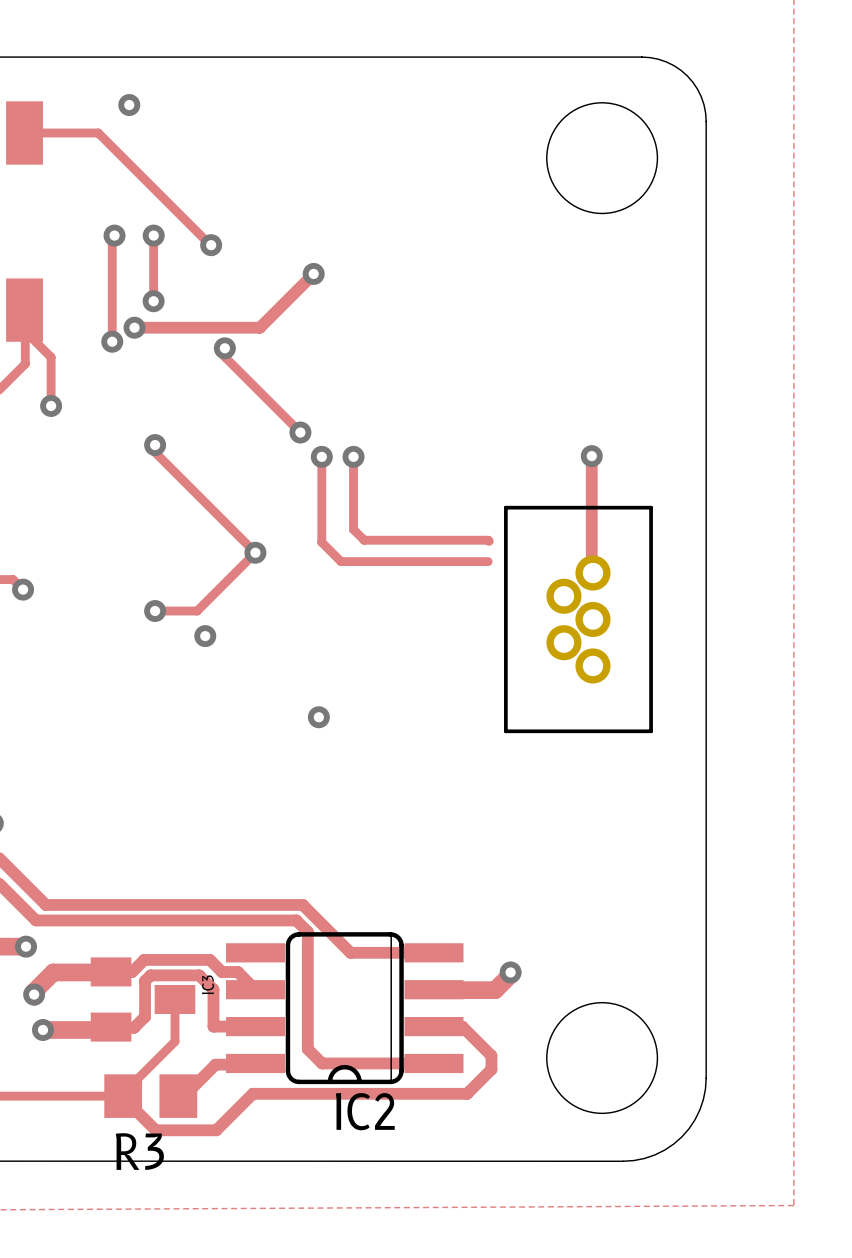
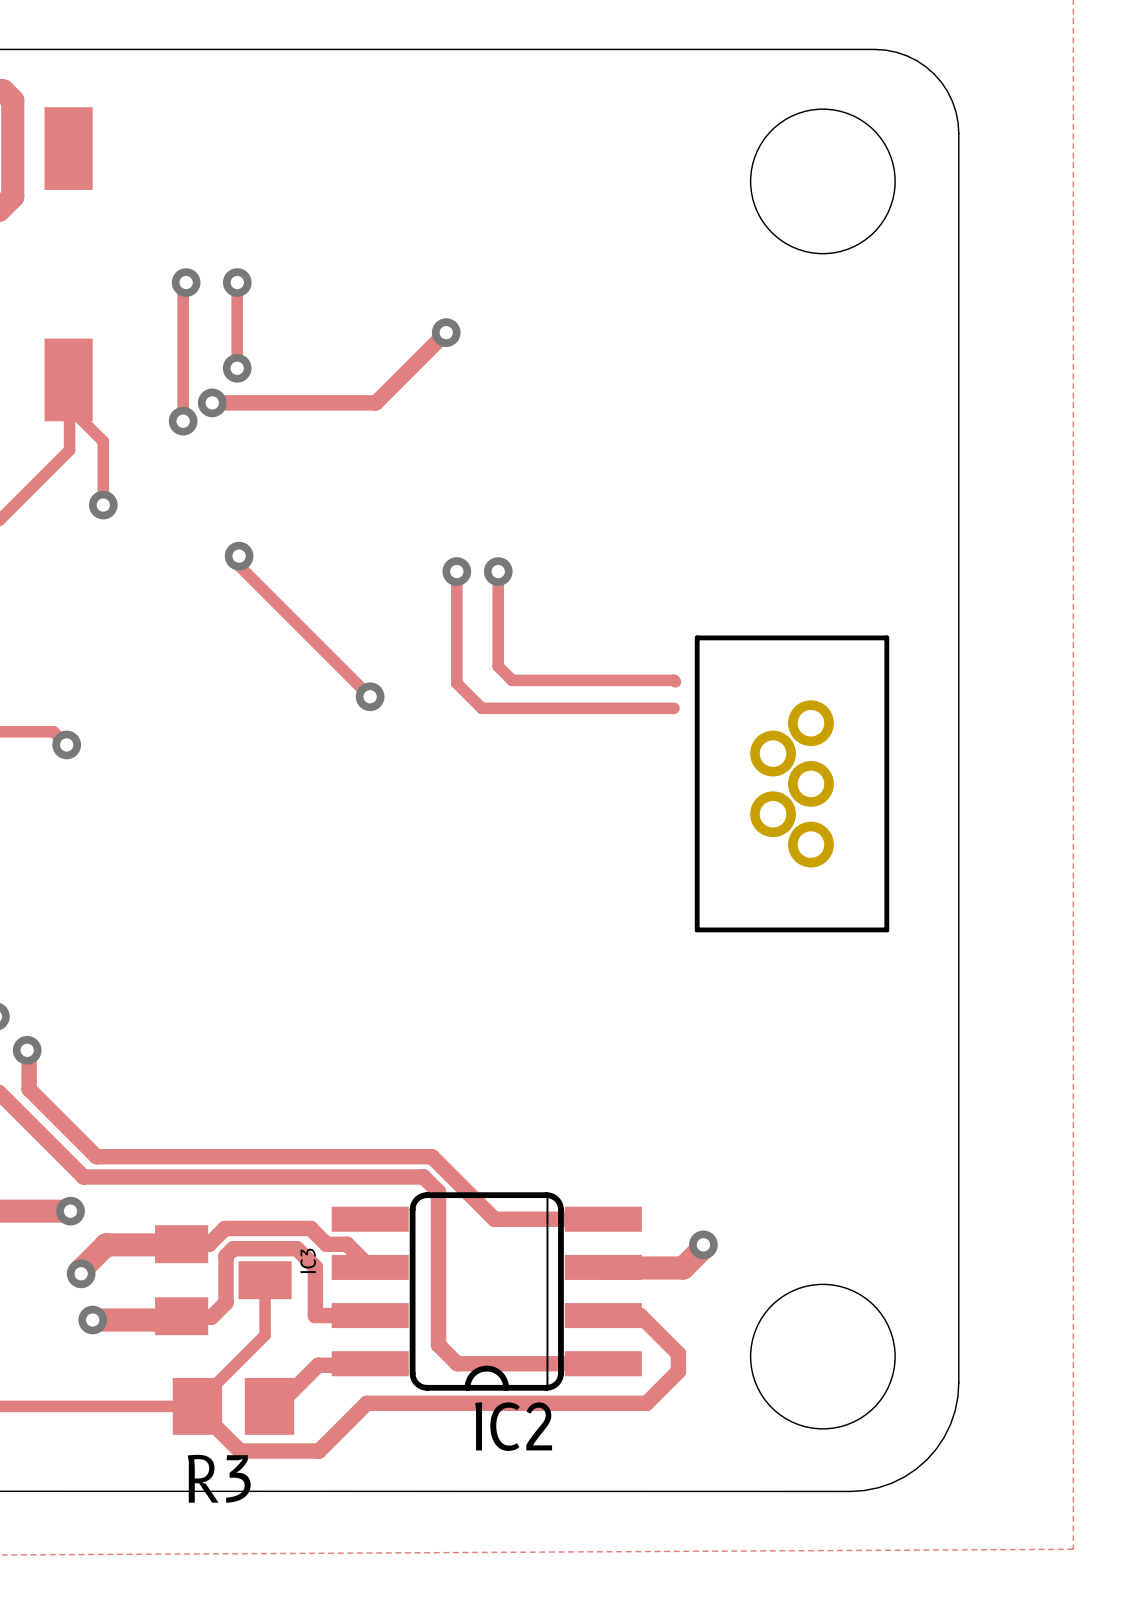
via: (129, 105) -> none
track: (24, 132) (98, 132) (211, 245) -> none
via: (211, 245) -> none
track: (224, 348) (224, 356) (300, 432) -> none
via: (224, 348) -> none
via: (300, 432) -> none
track: (591, 456) (592, 573) -> none
via: (591, 456) -> none
track: (255, 552) (197, 611) (155, 611) -> none
via: (155, 611) -> none
via: (205, 636) -> none
via: (318, 717) -> none

